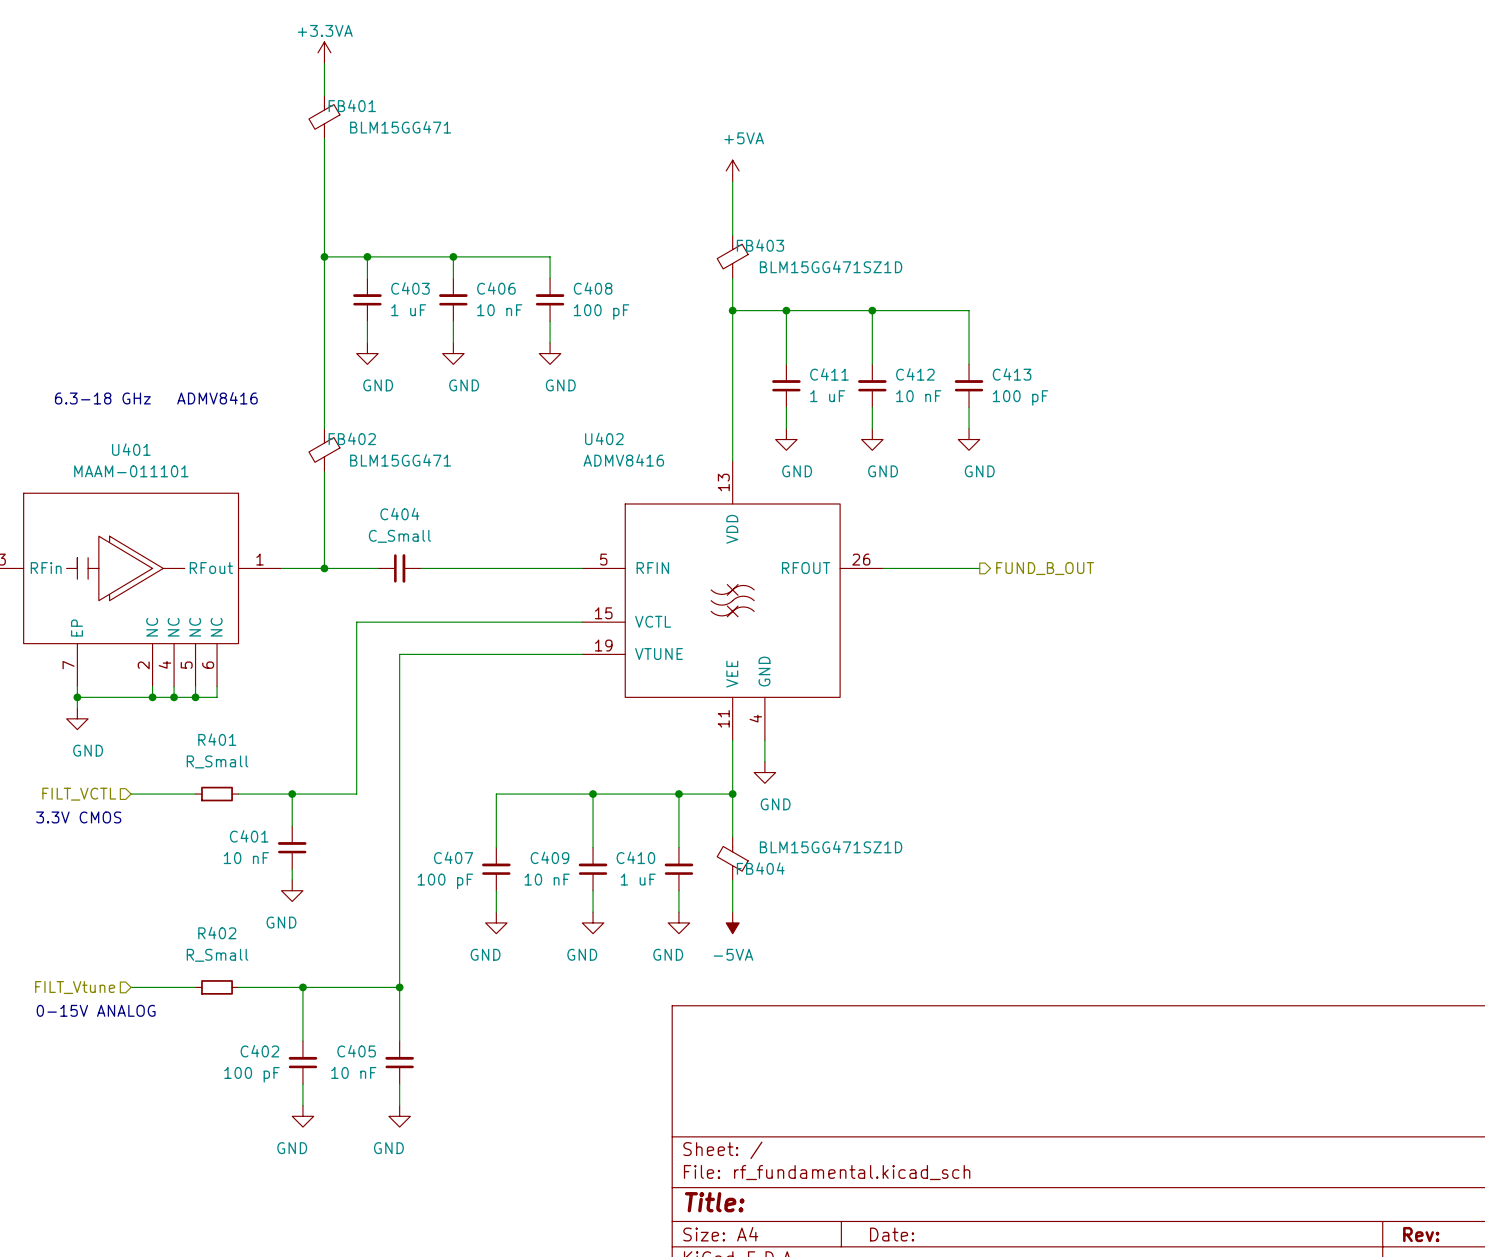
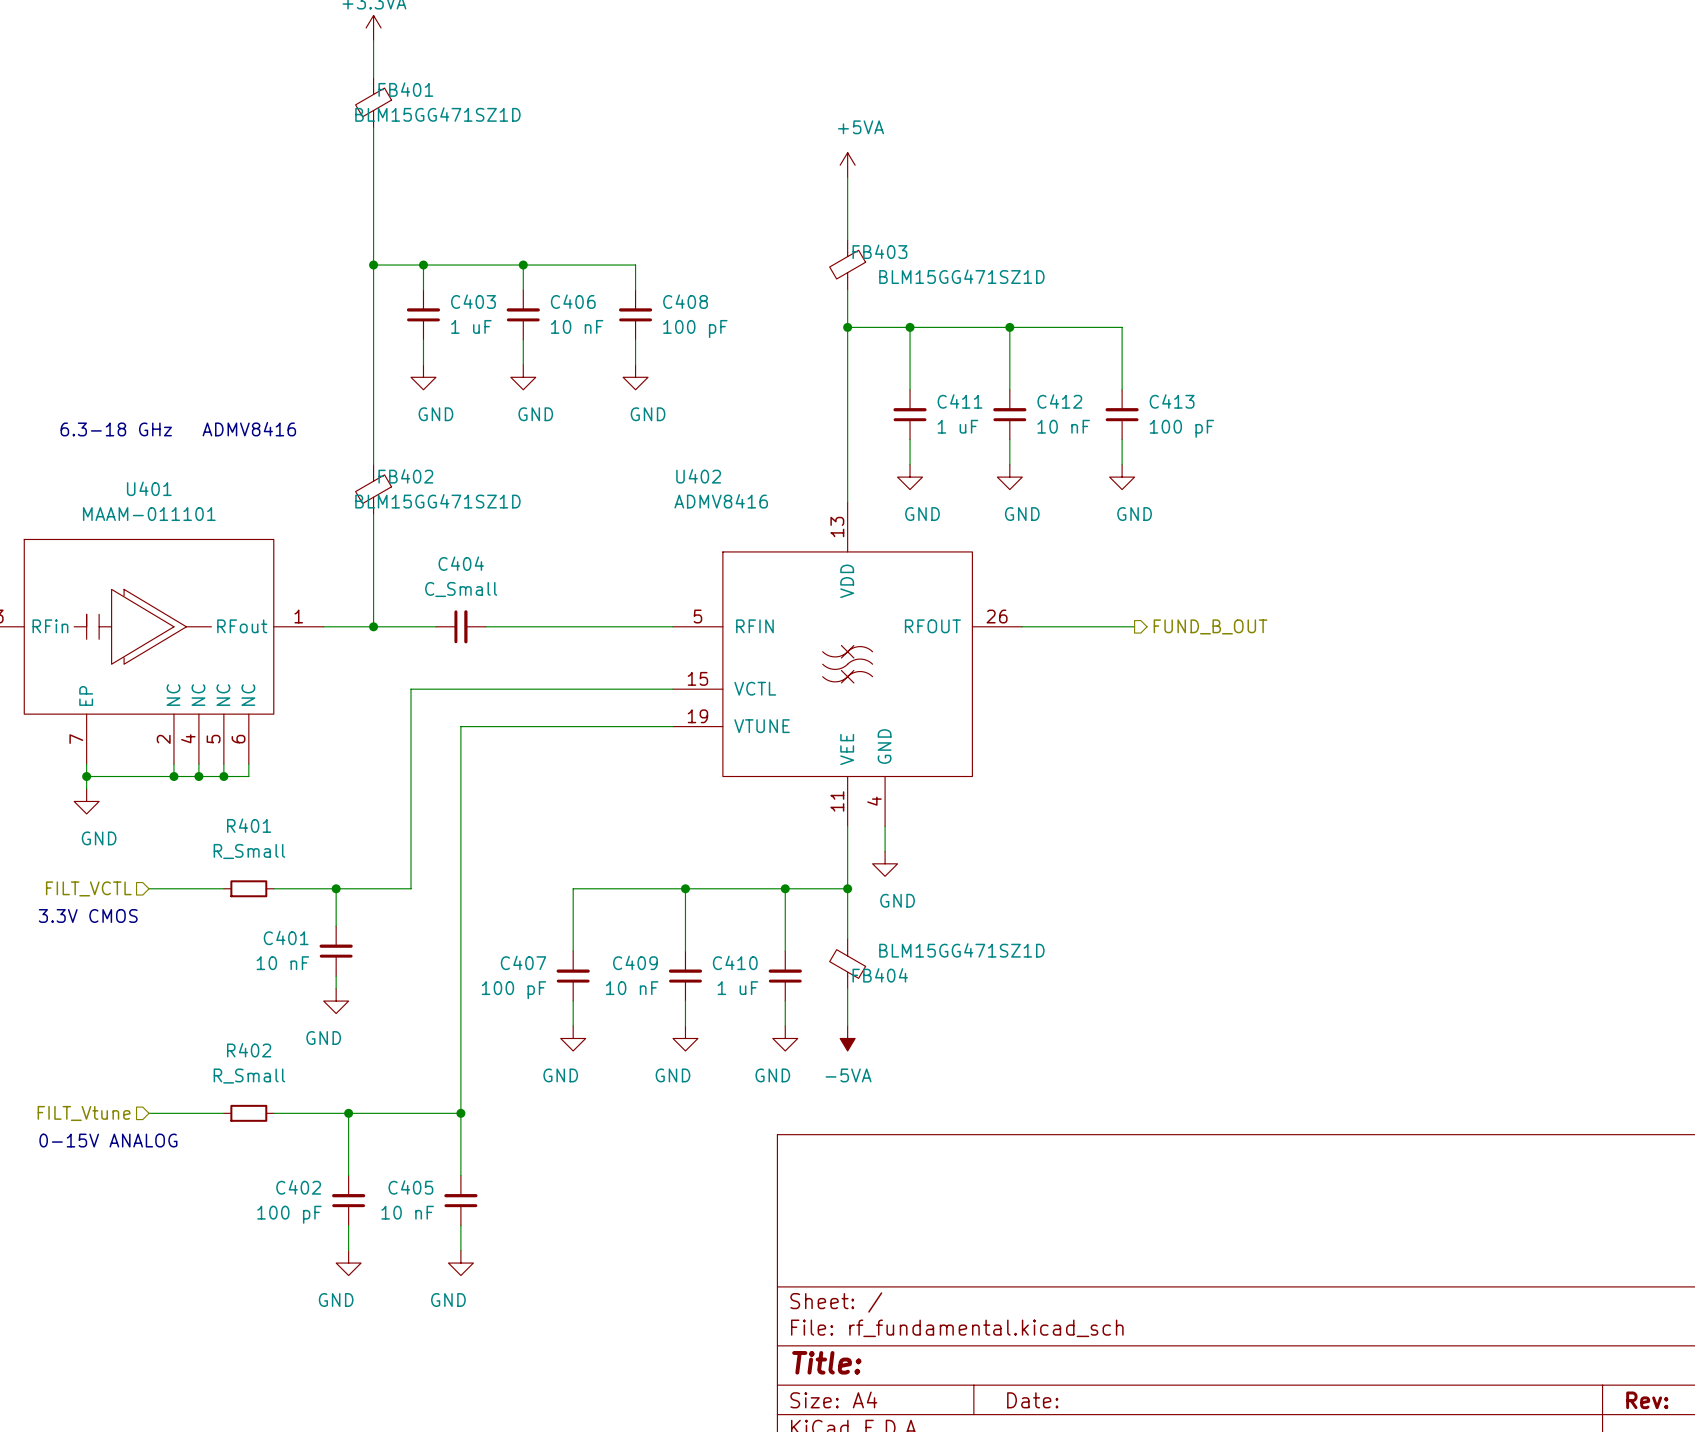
FB401 value: BLM15GG471 (400, 127) -> BLM15GG471SZ1D (437, 114)
FB402 value: BLM15GG471 (400, 460) -> BLM15GG471SZ1D (437, 501)

